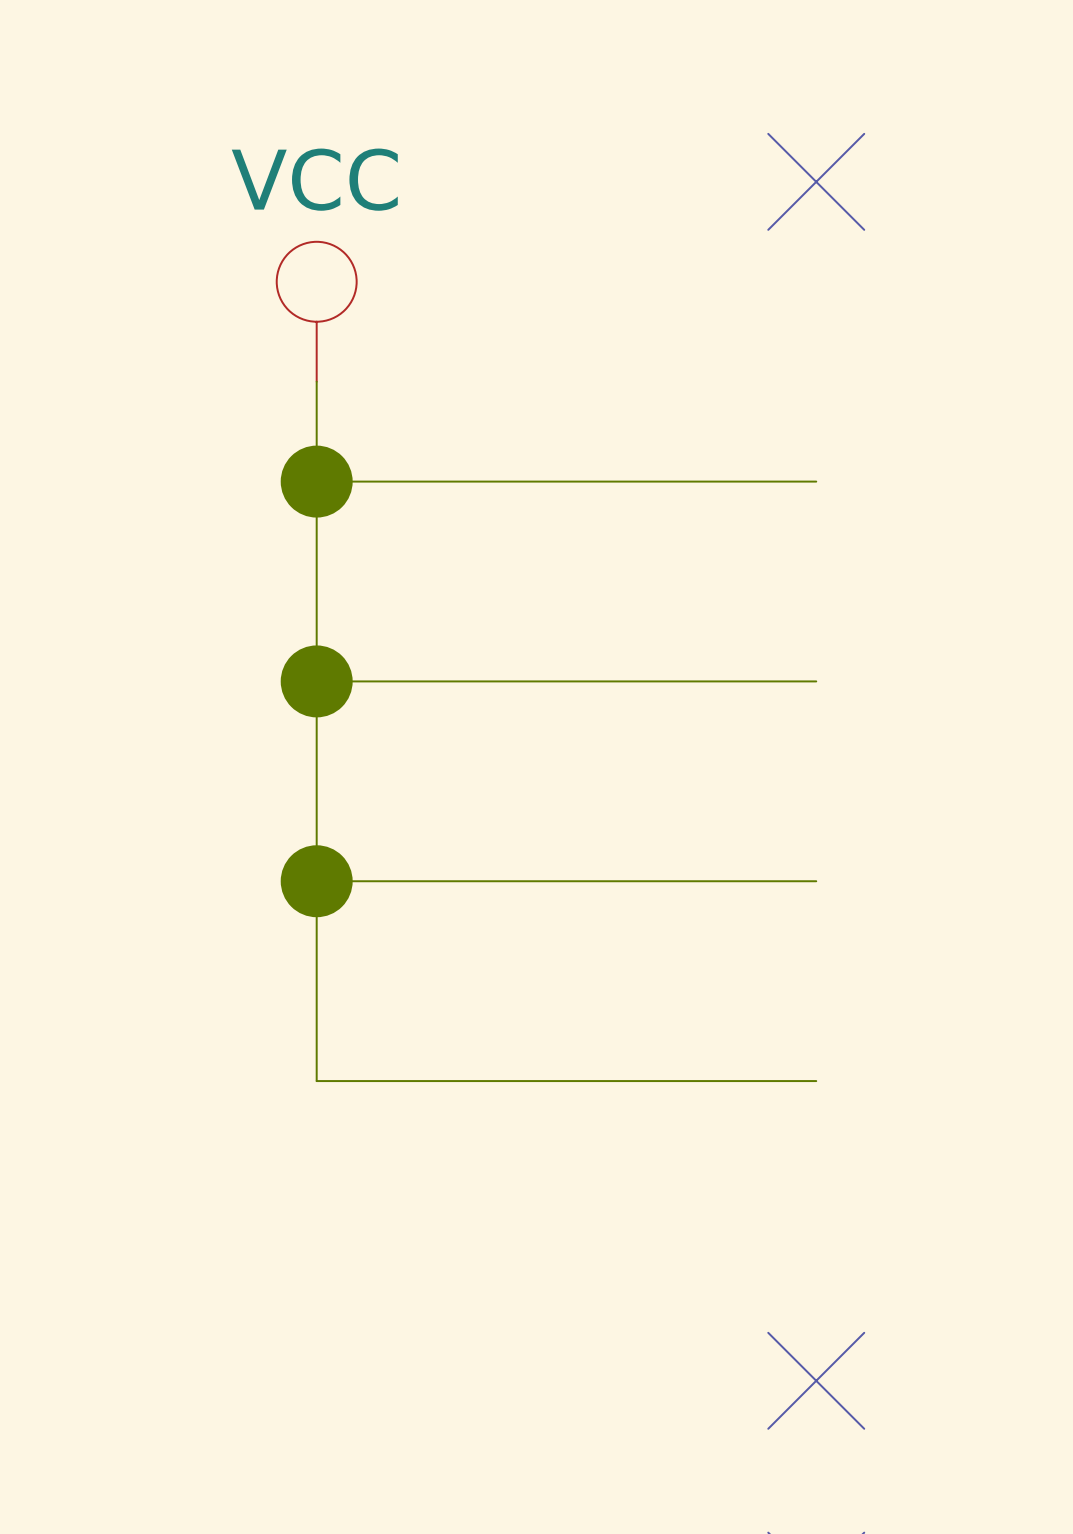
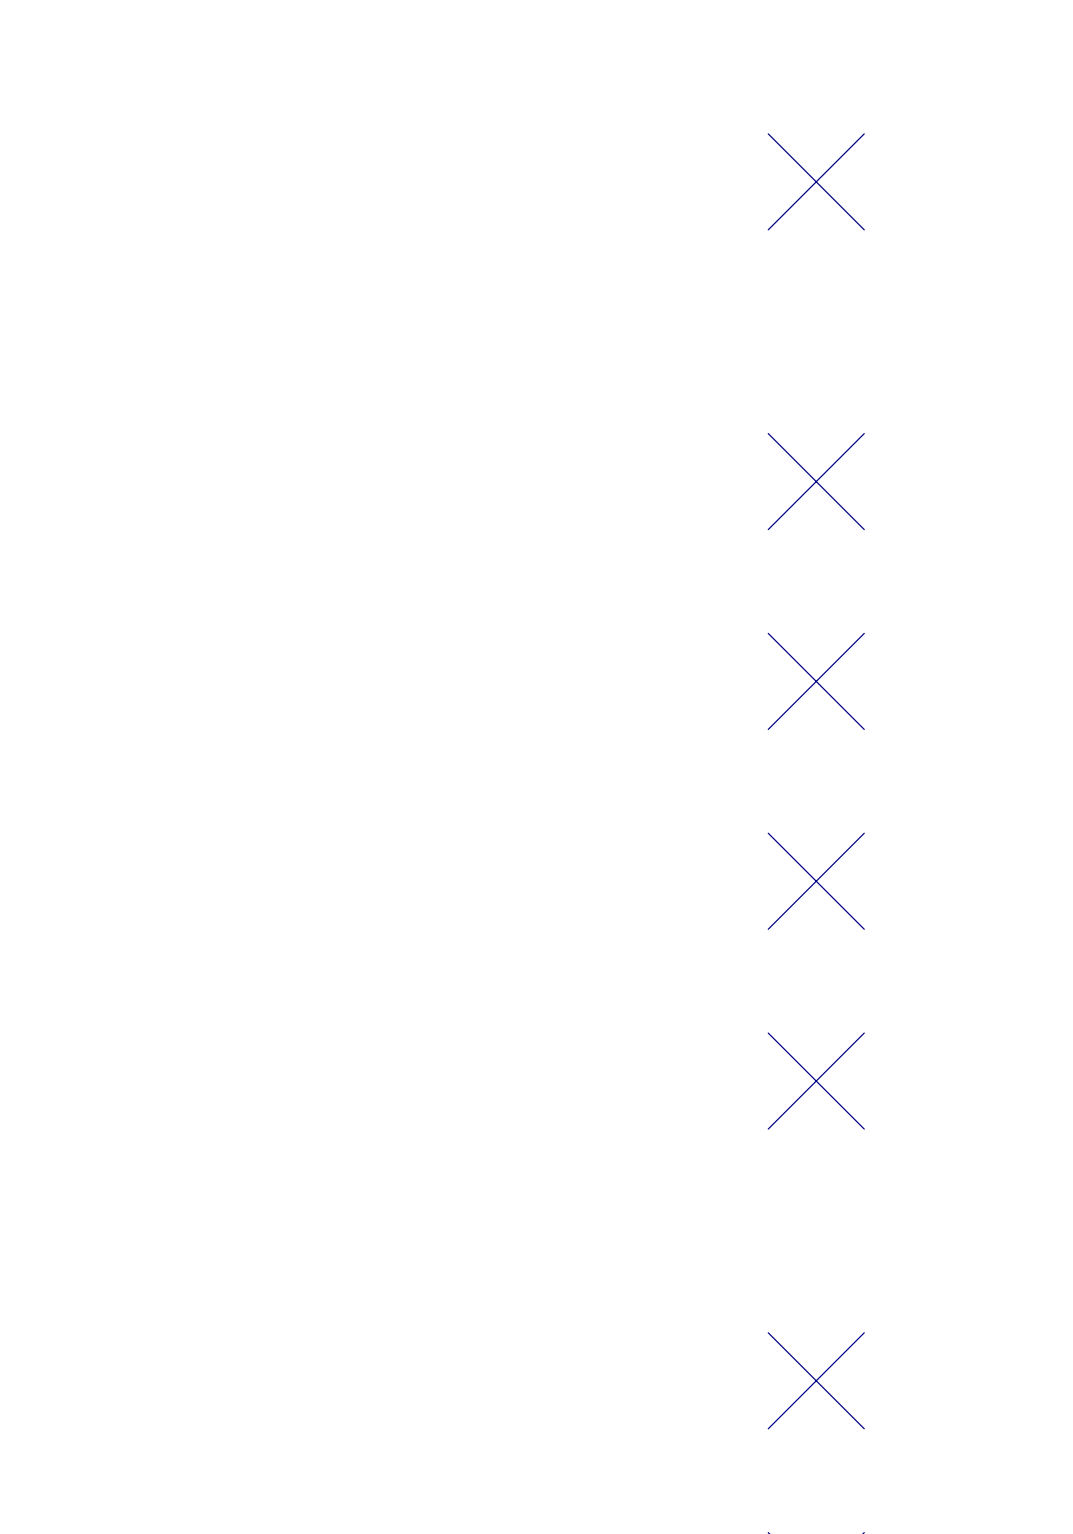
power symbol: VCC (316, 311) -> none
wire: (316, 381) (316, 1081) (816, 1081) -> none
wire: (316, 481) (816, 481) -> none
junction: (316, 481) -> none
no-connect mark: none -> (816, 481)
wire: (316, 681) (816, 681) -> none
junction: (316, 681) -> none
no-connect mark: none -> (816, 681)
wire: (316, 881) (816, 881) -> none
junction: (316, 881) -> none
no-connect mark: none -> (816, 881)
no-connect mark: none -> (816, 1081)

